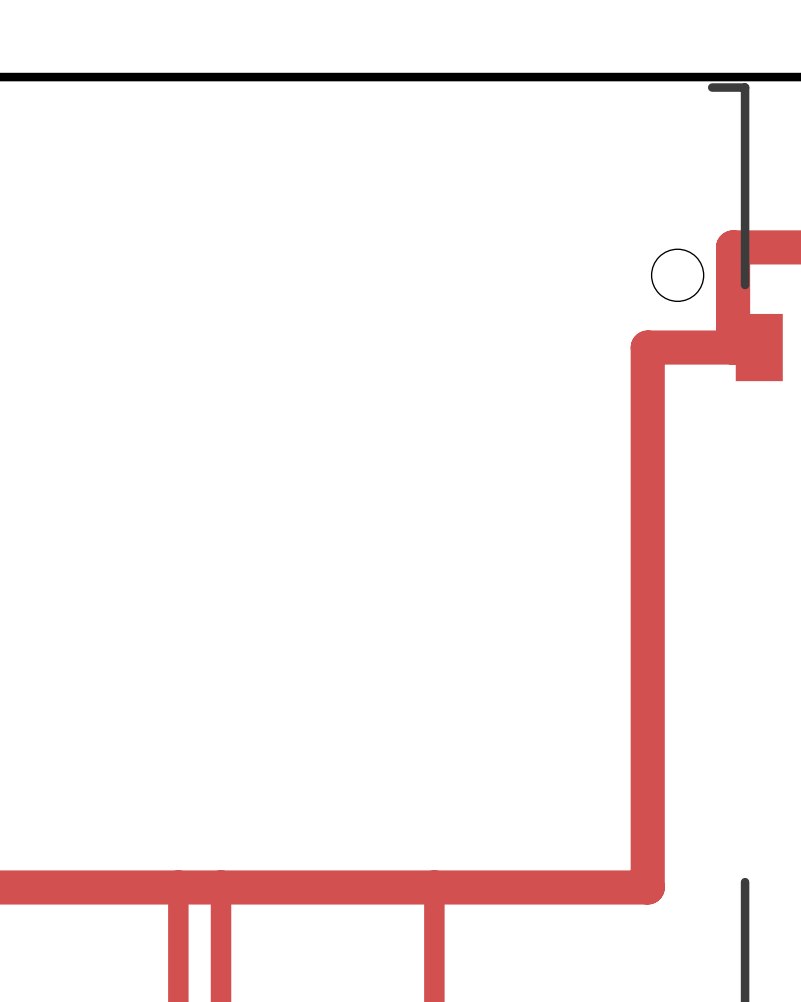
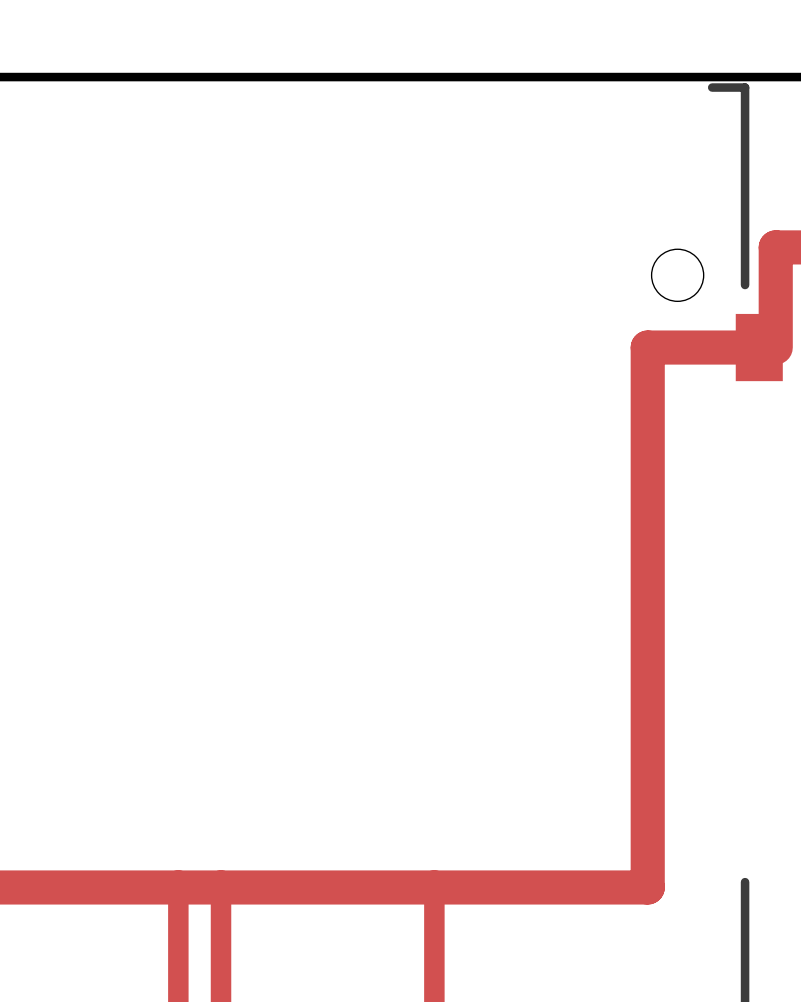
top track: (775, 247) (733, 247) (733, 347) -> (775, 247) (775, 347) (759, 347)

